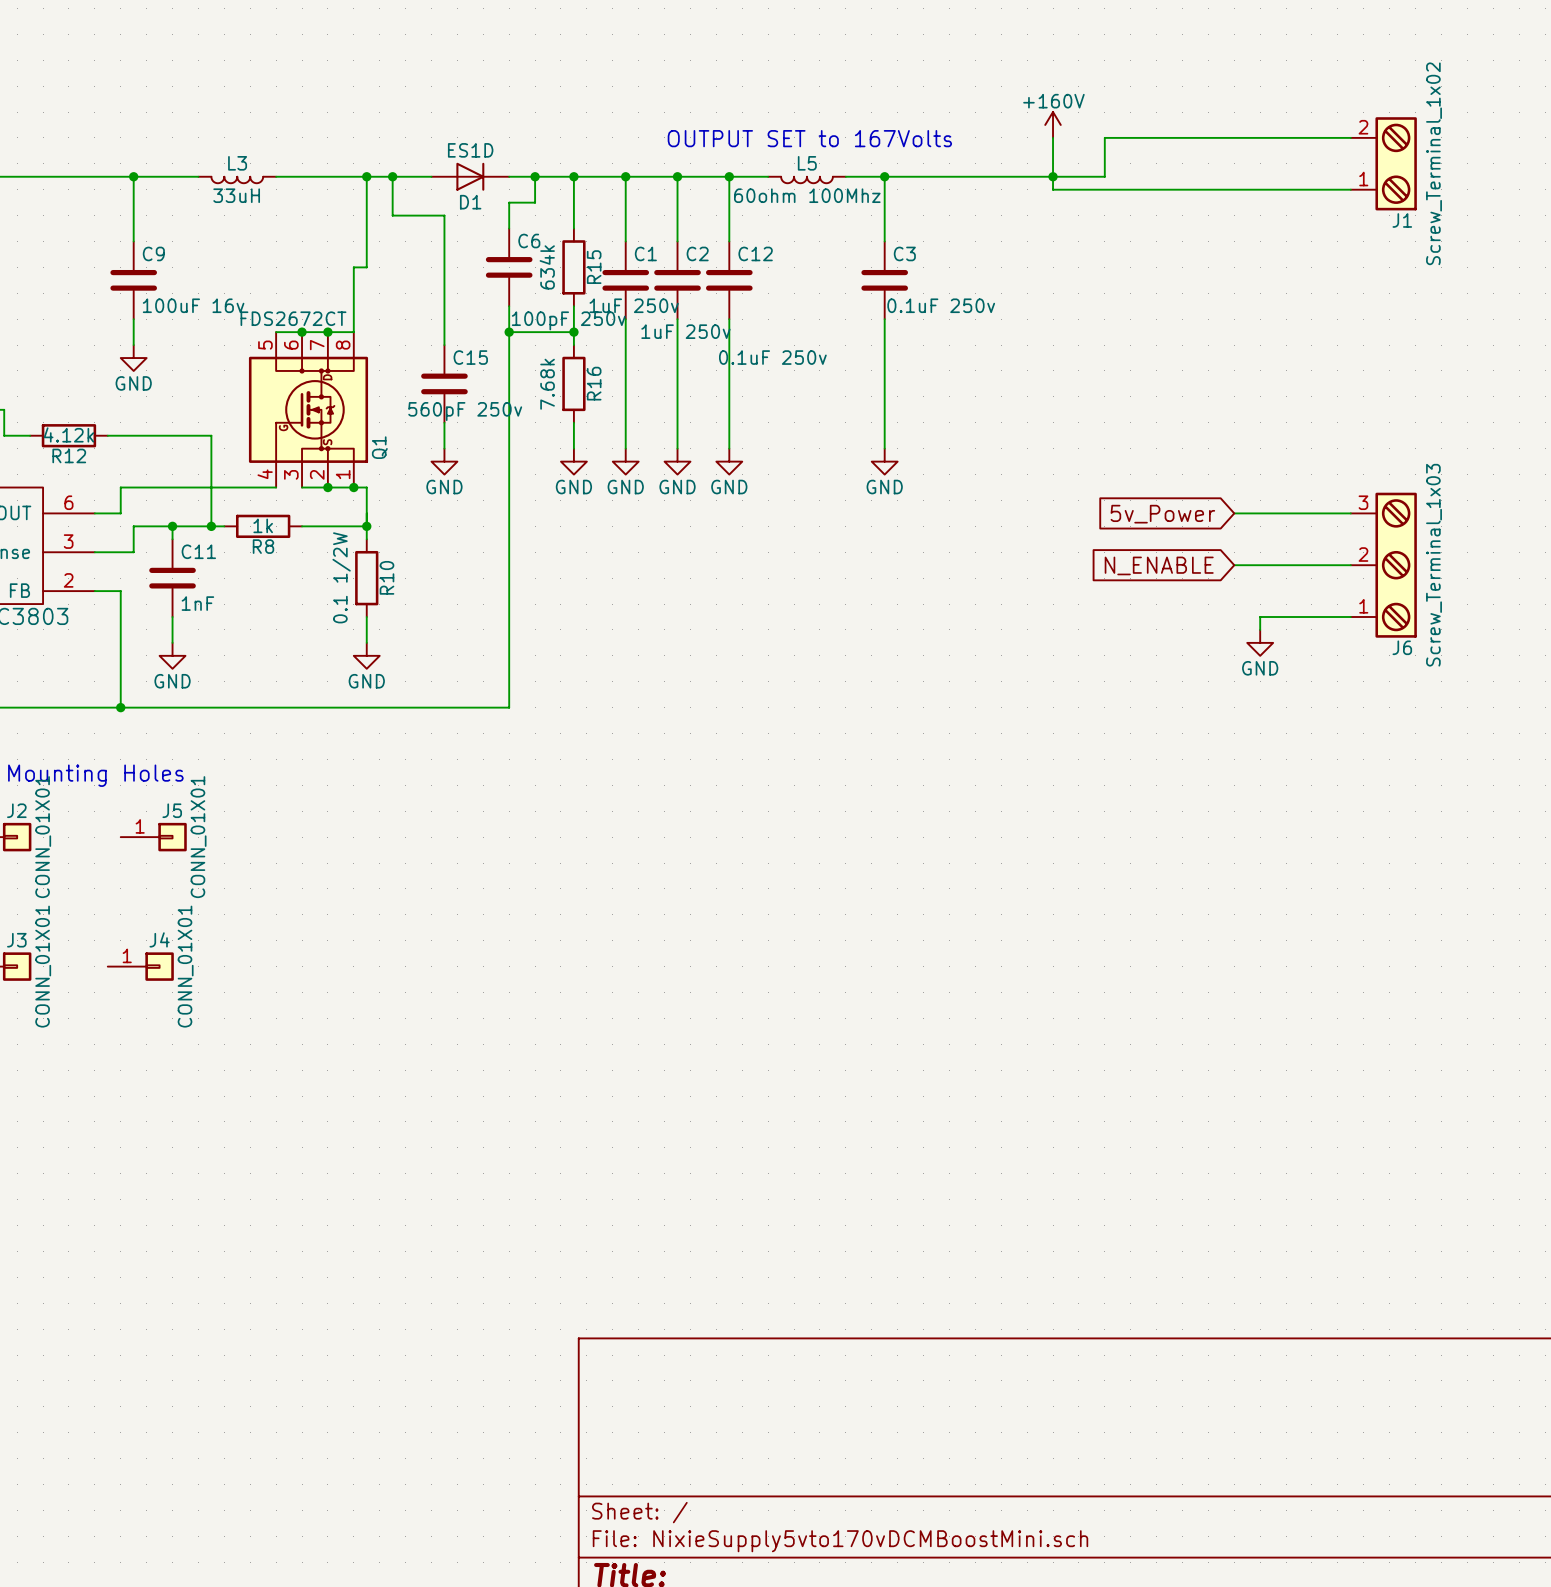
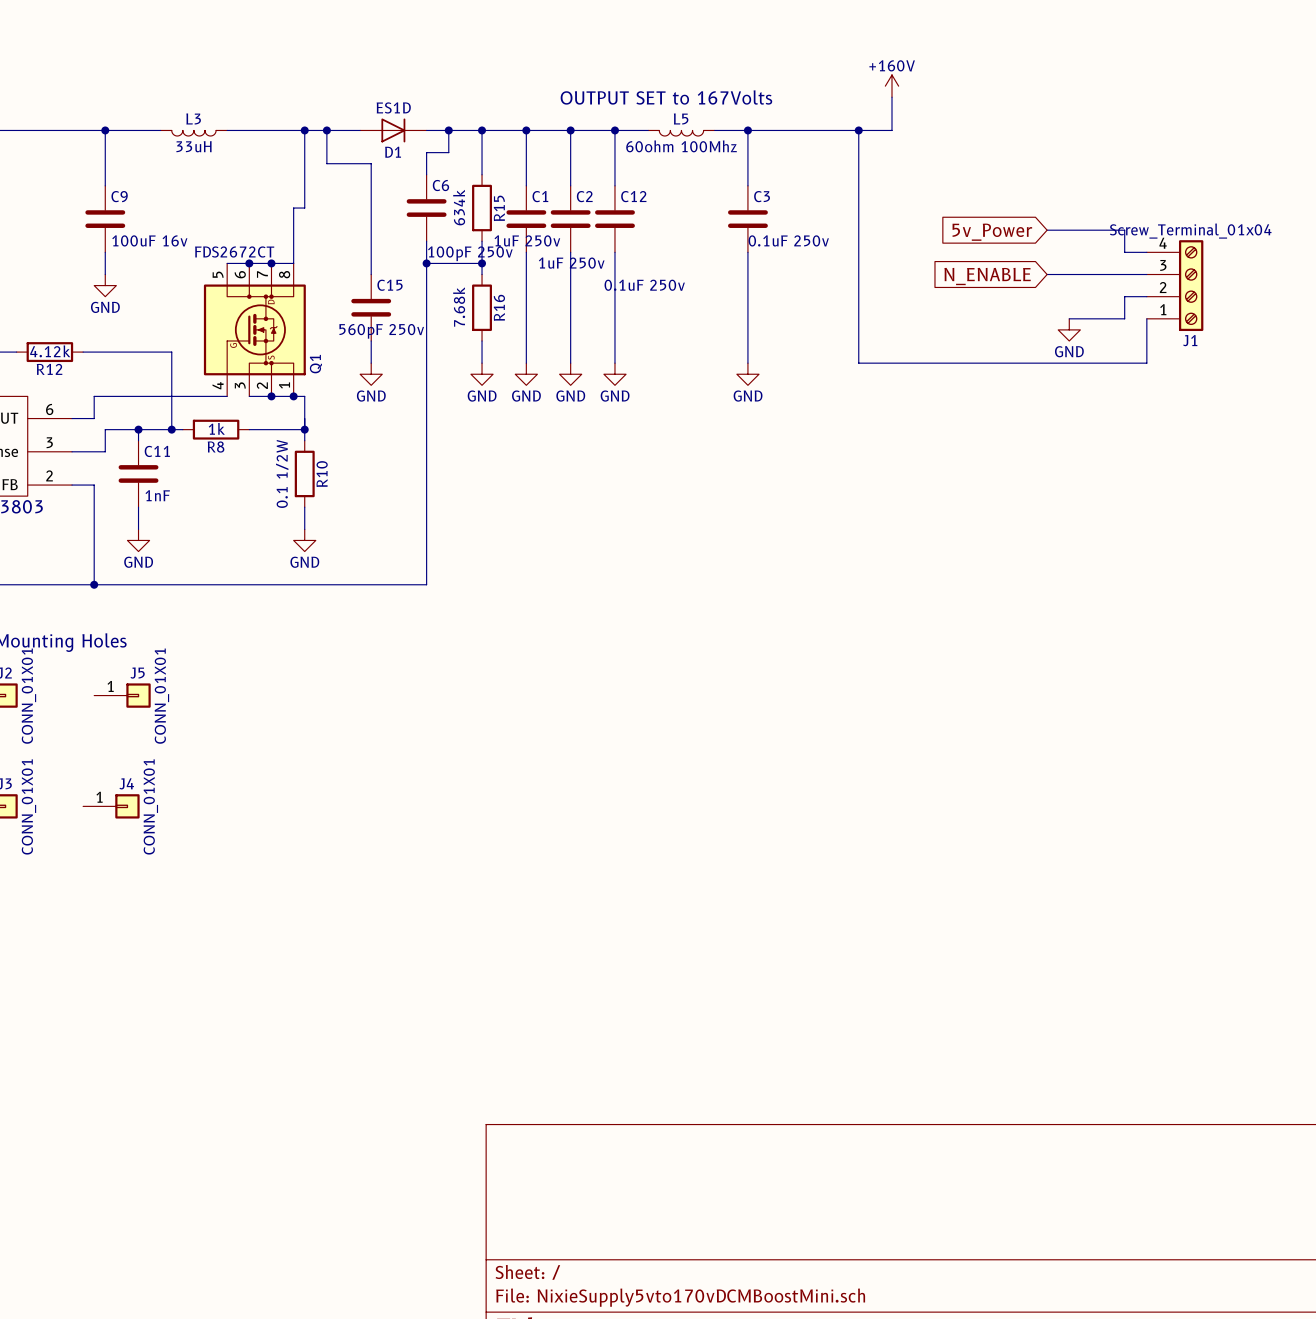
J1 symbol: [1350, 117, 1417, 211] -> [1146, 240, 1204, 332]
wire: (1350, 137) (1104, 137) (1104, 176) (1053, 176) (1053, 189) (1350, 189) -> none
J1 value: Screw_Terminal_1x02 (1434, 163) -> Screw_Terminal_01x04 (1190, 231)
wire: none -> (858, 130) (858, 363) (1146, 363) (1146, 318)
junction position: (1053, 176) -> (858, 130)
wire: none -> (1047, 230) (1124, 230) (1124, 252) (1146, 252)
wire: none -> (1146, 296) (1124, 296) (1124, 318) (1069, 318)
wire: (1234, 513) (1350, 513) -> (1047, 274) (1146, 274)
global label position: 5v_Power (1162, 514) -> 5v_Power (992, 232)
global label position: N_ENABLE (1159, 565) -> N_ENABLE (987, 276)
wire: (1234, 565) (1350, 565) -> none
J6: Screw_Terminal_1x03 (1383, 565) -> none
wire: (1350, 617) (1260, 617) (1260, 629) -> none
power symbol position: GND (1260, 642) -> GND (1069, 329)

